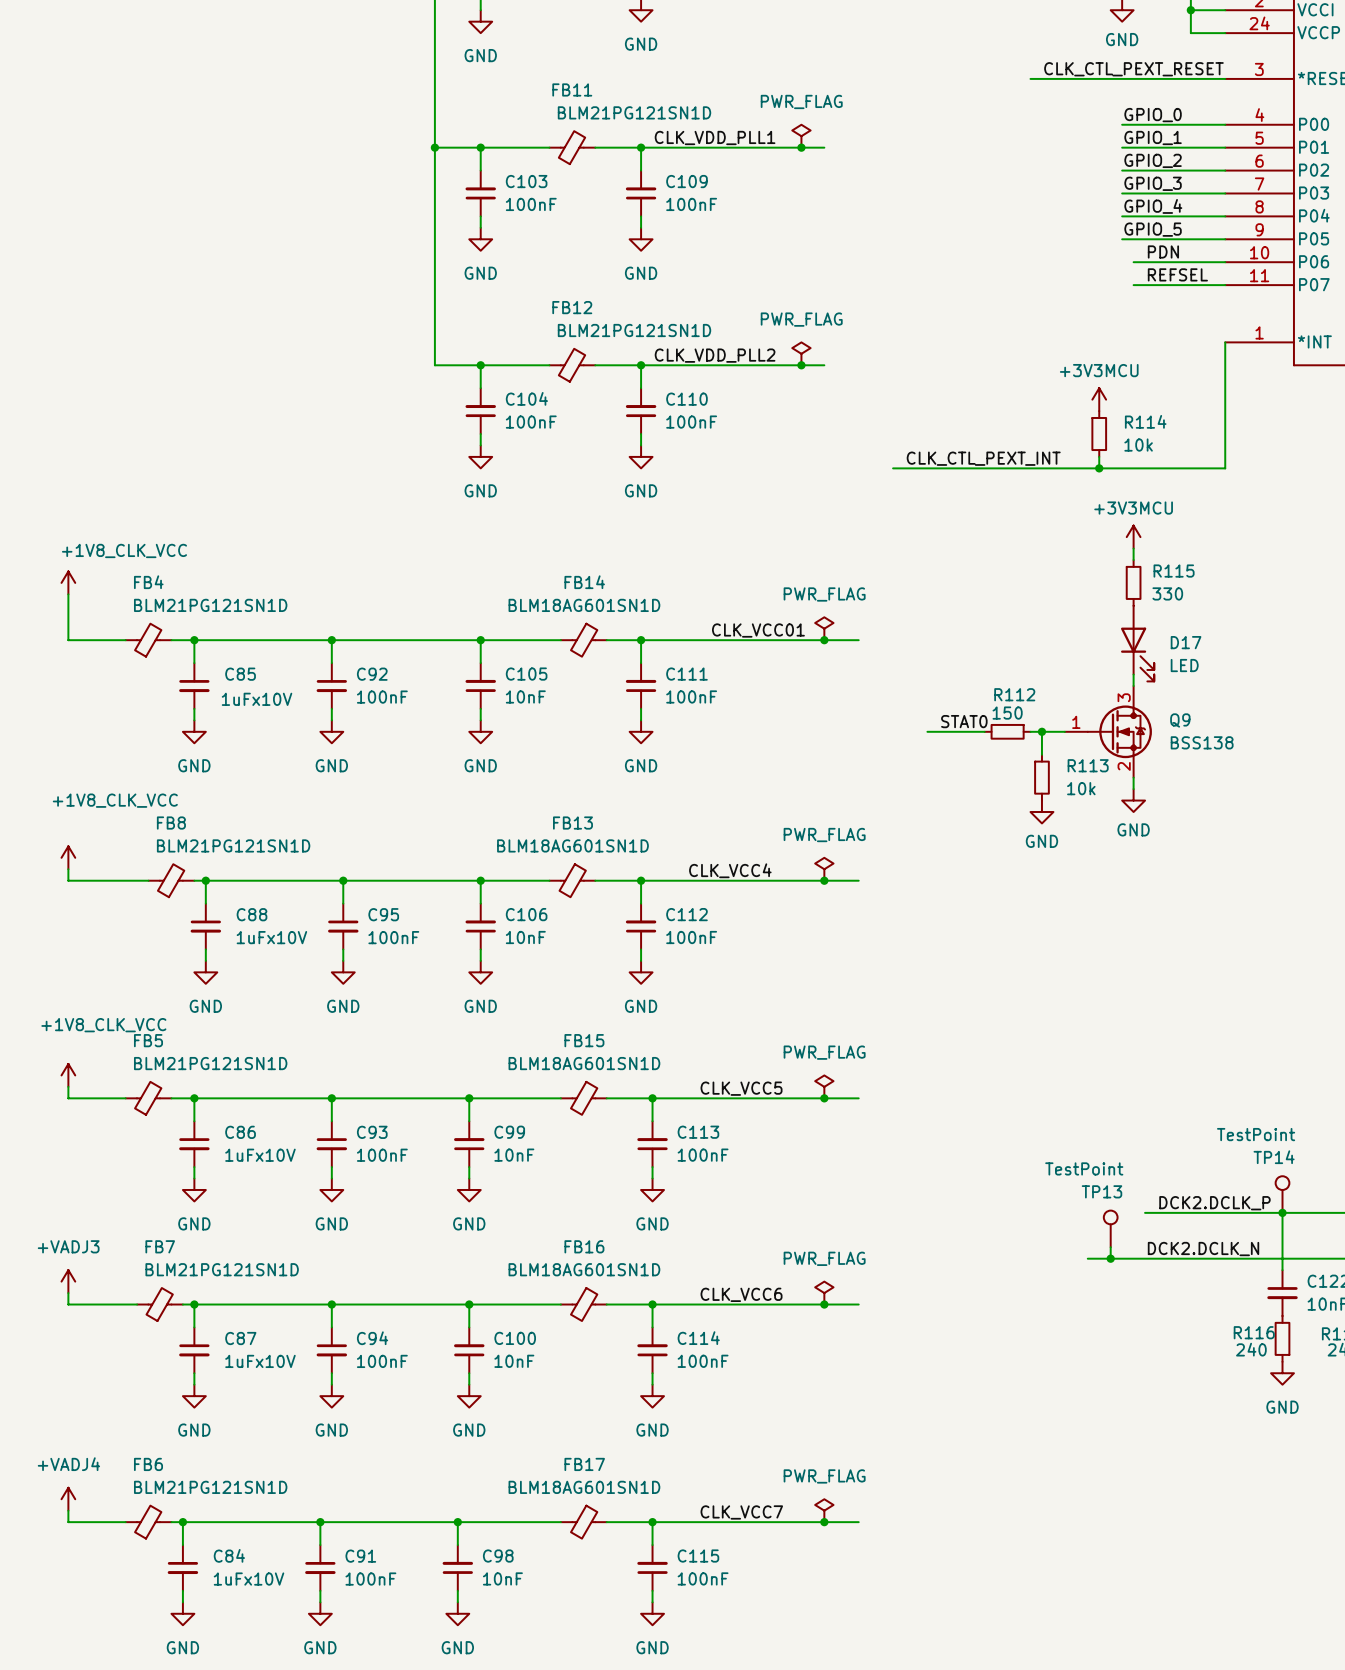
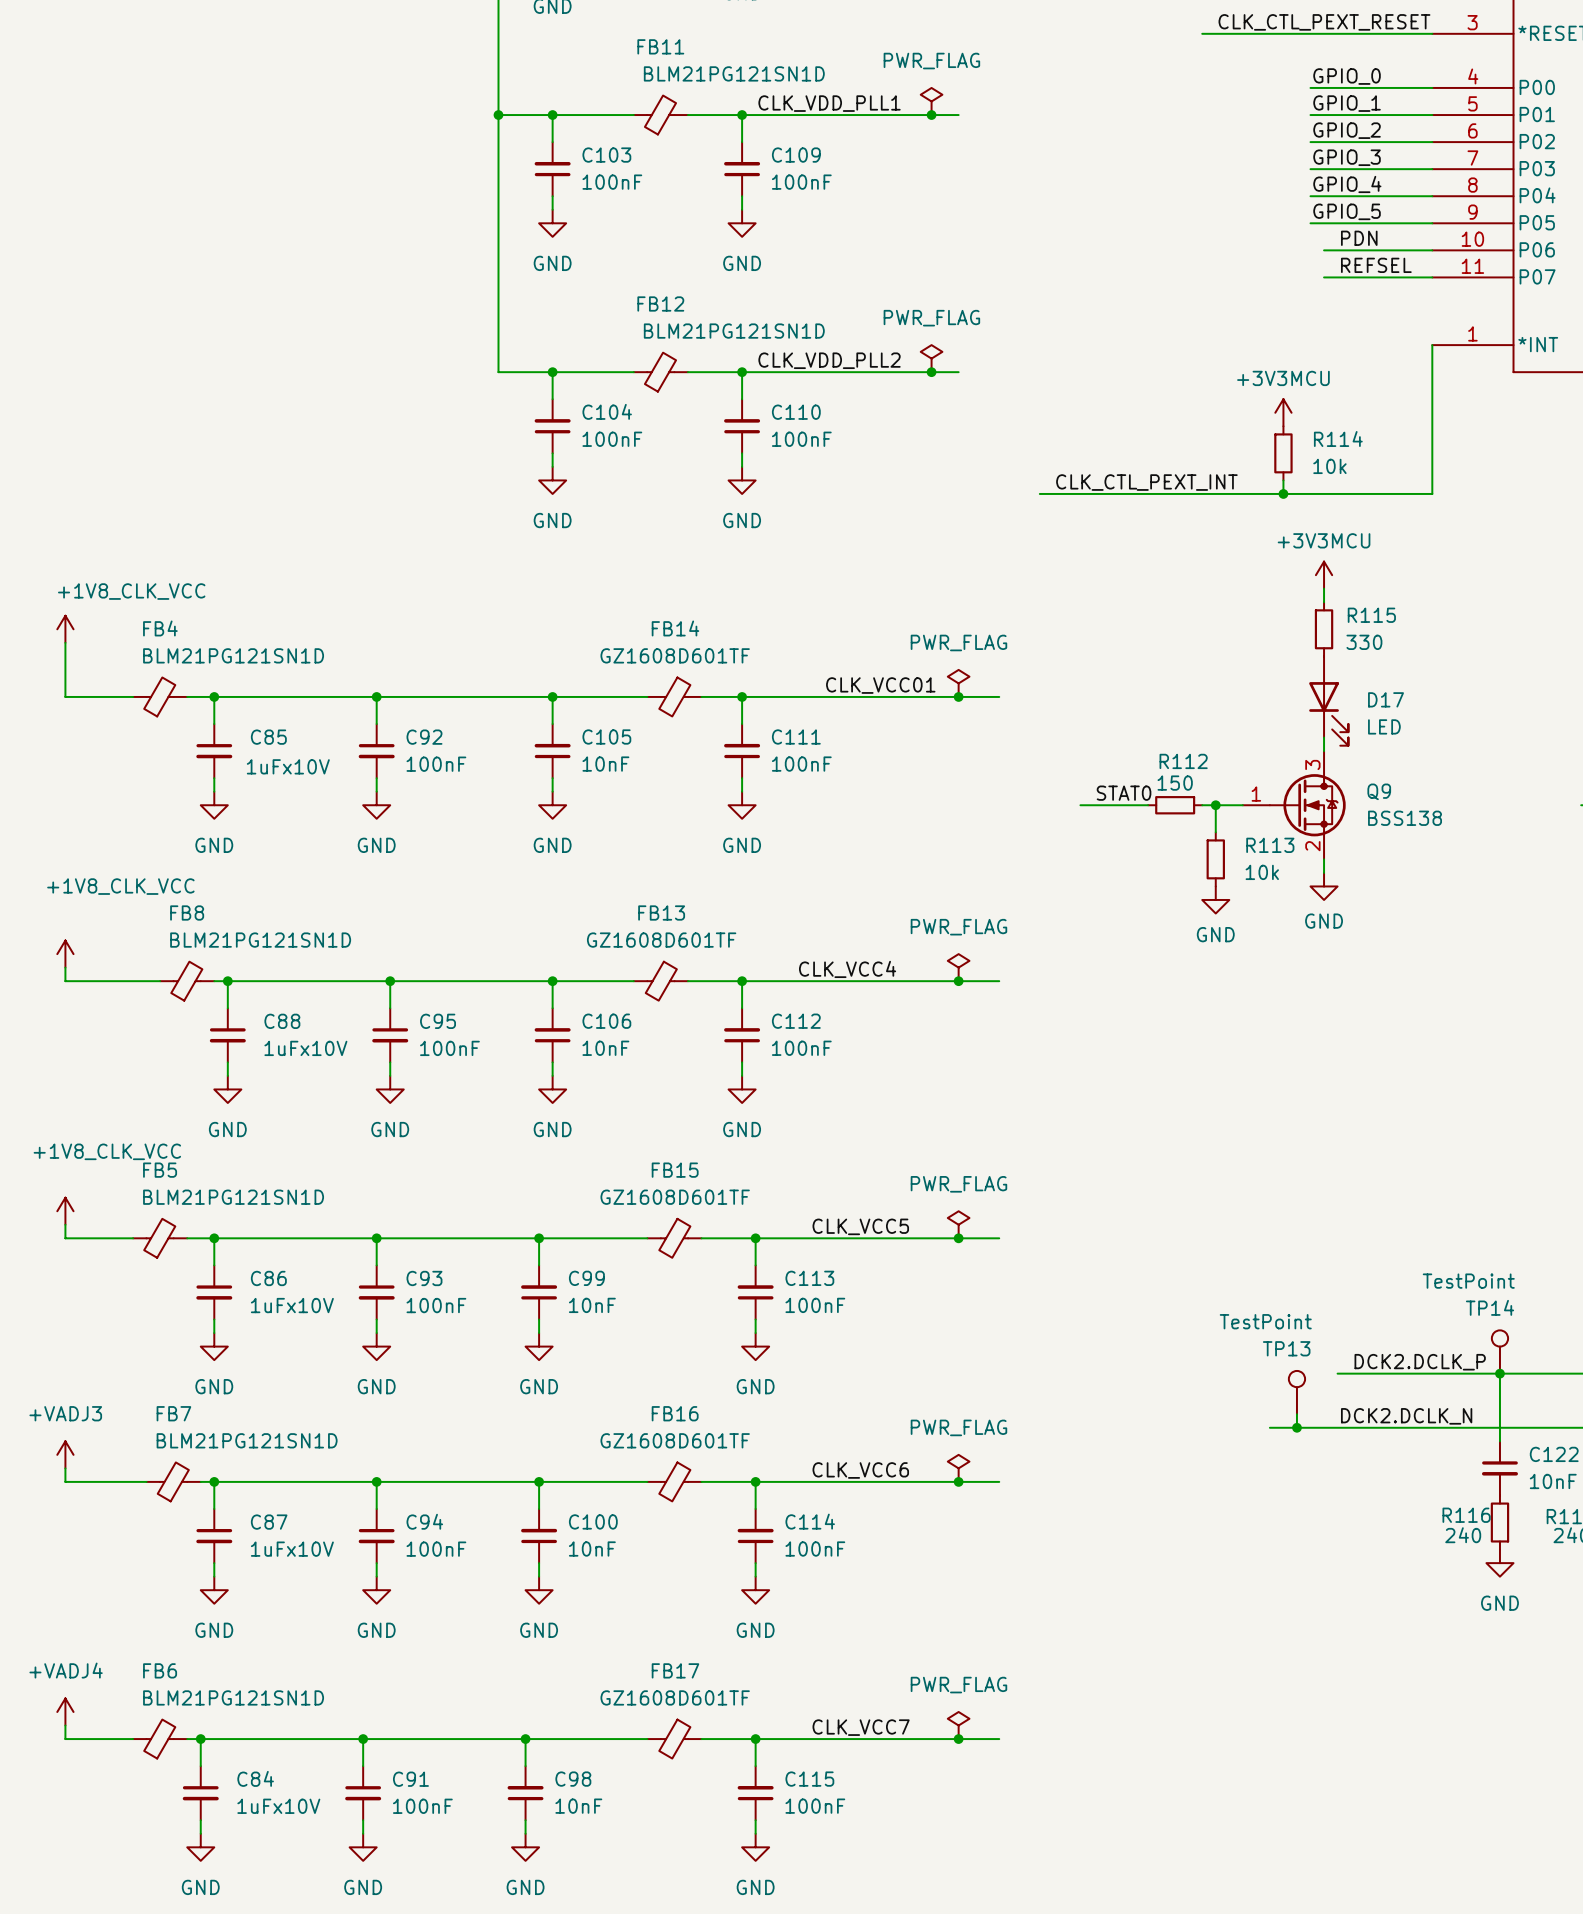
FB14 value: BLM18AG601SN1D (584, 605) -> GZ1608D601TF (675, 655)
FB13 value: BLM18AG601SN1D (572, 845) -> GZ1608D601TF (661, 940)
FB15 value: BLM18AG601SN1D (584, 1063) -> GZ1608D601TF (675, 1197)
FB16 value: BLM18AG601SN1D (584, 1269) -> GZ1608D601TF (675, 1440)
FB17 value: BLM18AG601SN1D (584, 1487) -> GZ1608D601TF (675, 1697)

